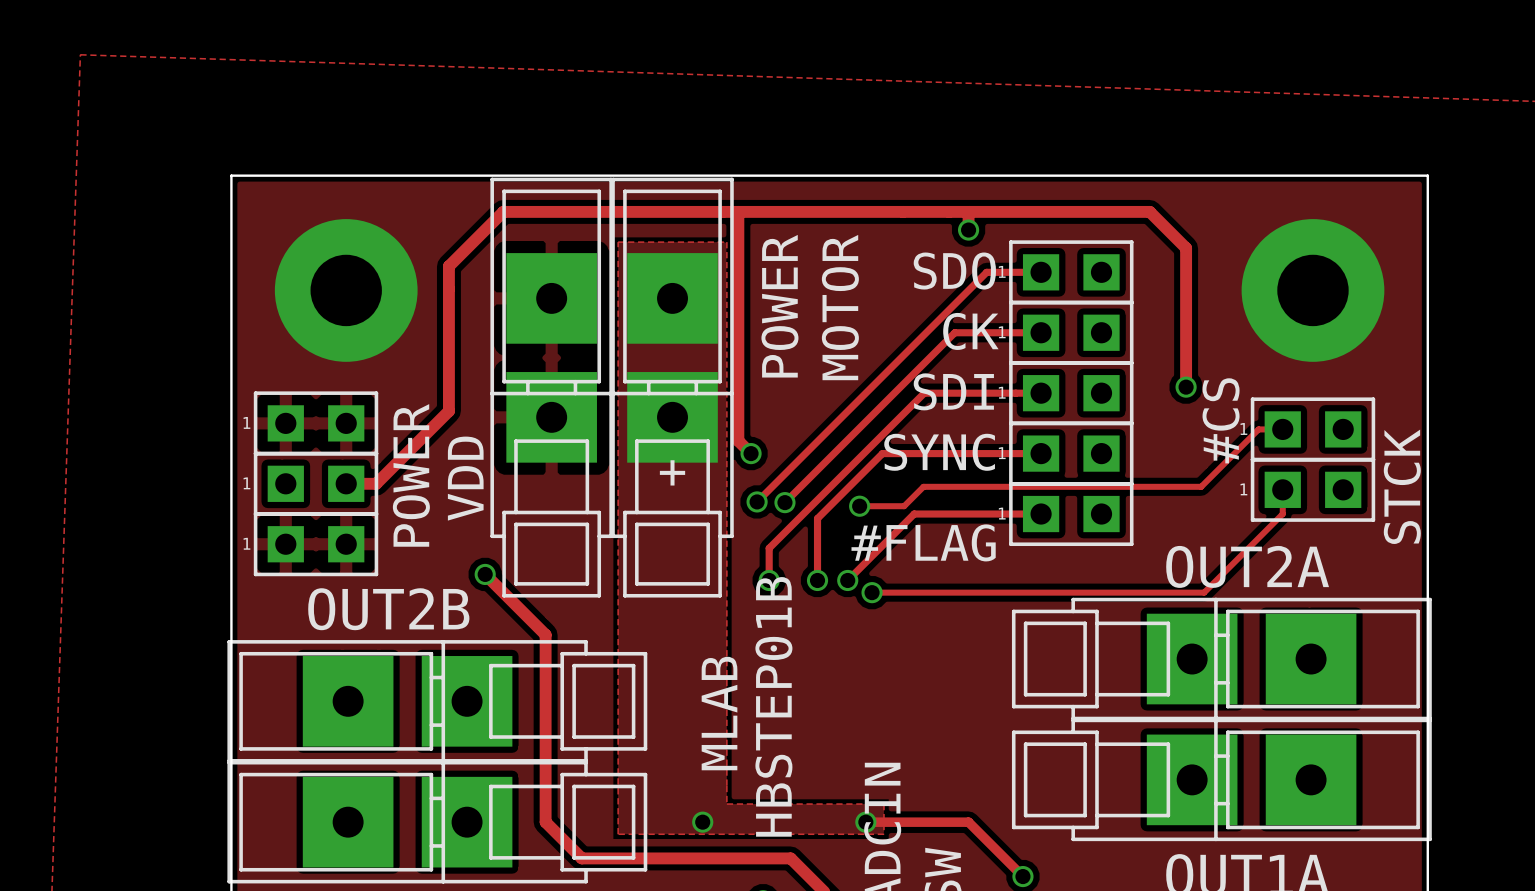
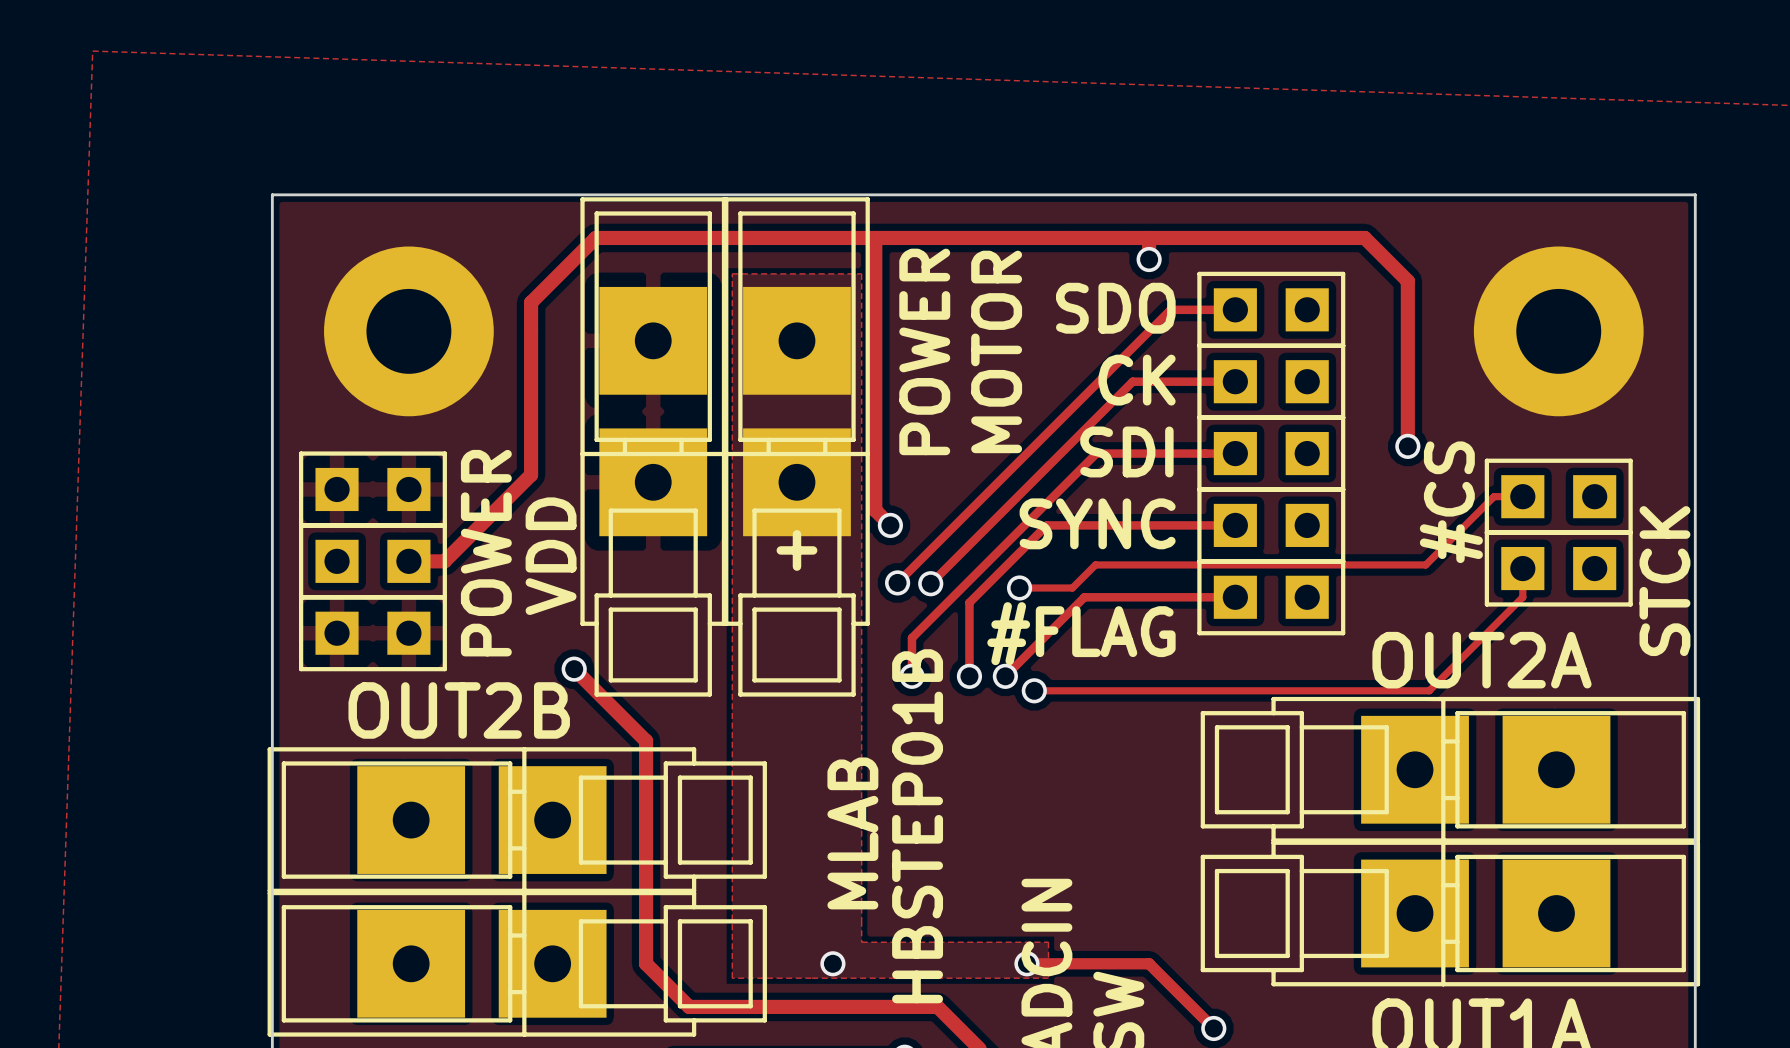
part text: 1 (1002, 271) -> none
part text: 1 (1002, 332) -> none
part text: 1 (1002, 392) -> none
part text: 1 (246, 422) -> none
part text: 1 (1243, 428) -> none
part text: 1 (1002, 453) -> none
part text: 1 (246, 483) -> none
part text: 1 (1243, 489) -> none
part text: 1 (1002, 513) -> none
part text: 1 (246, 543) -> none

